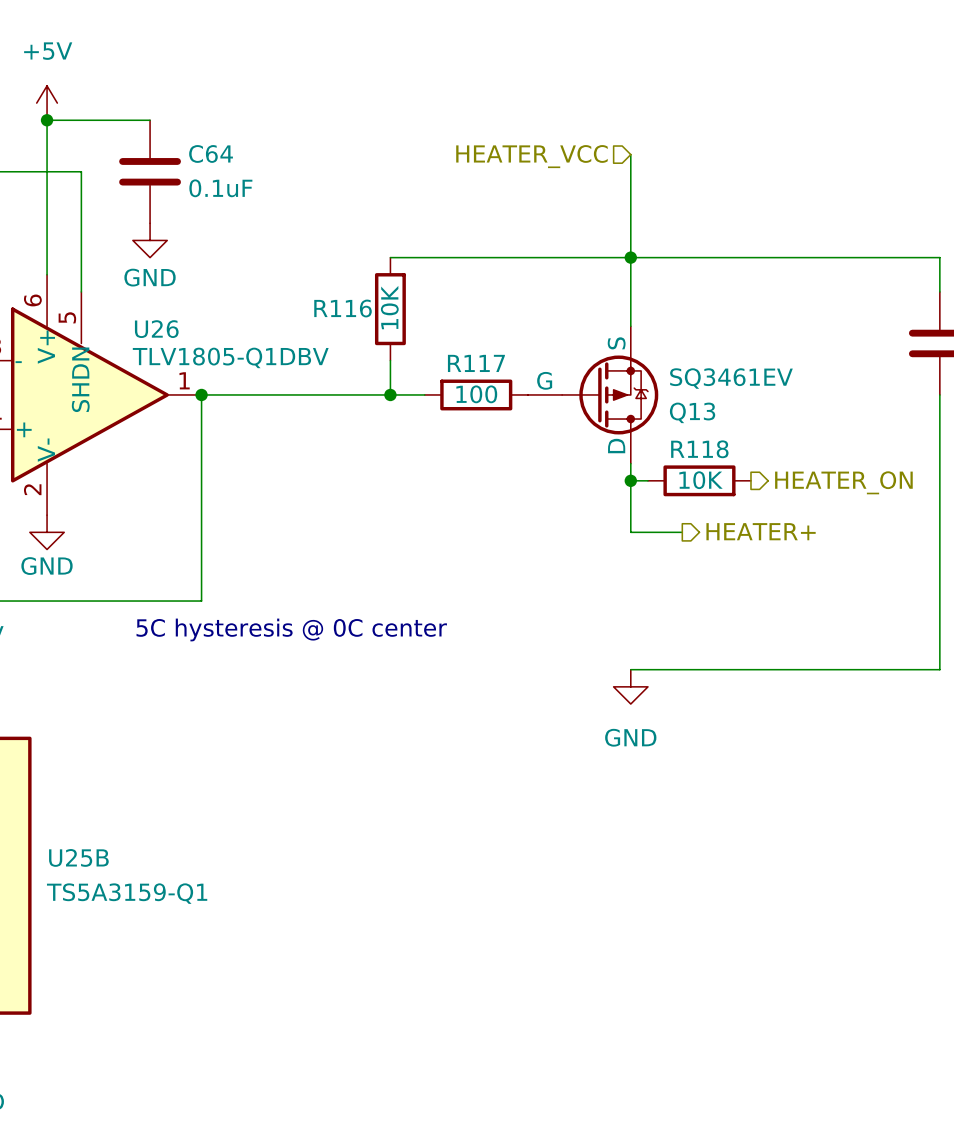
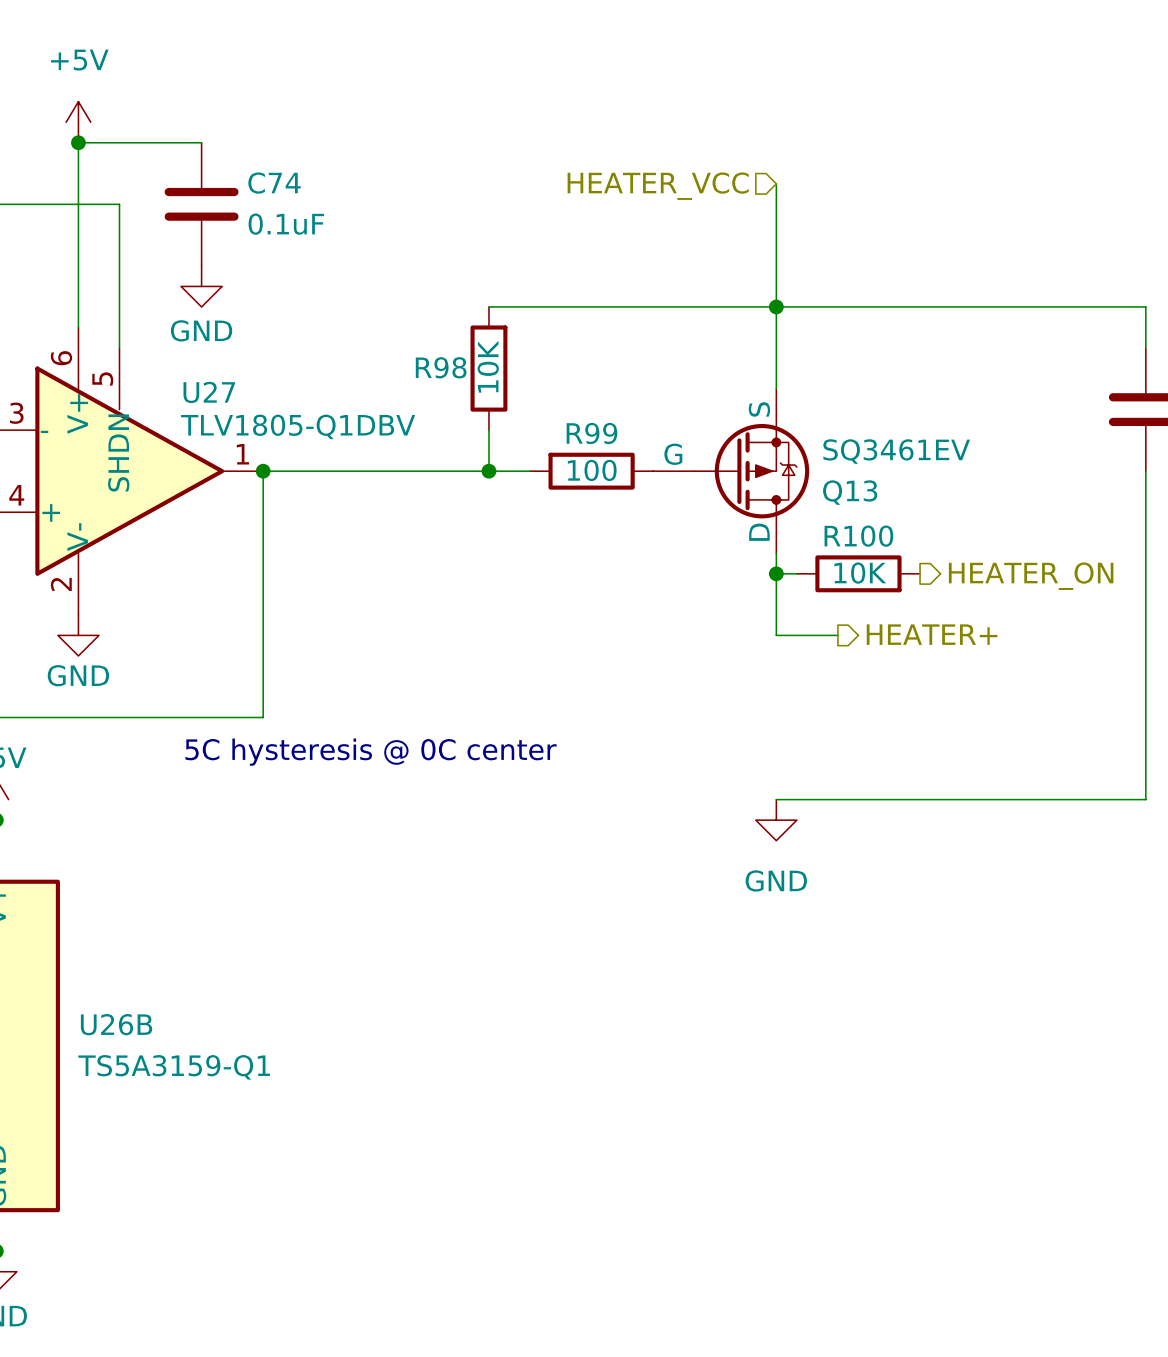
C64 name: C64 (211, 153) -> C74 (274, 183)
R116 name: R116 (343, 308) -> R98 (441, 367)
U26 name: U26 (156, 329) -> U27 (209, 392)
R117 name: R117 (476, 363) -> R99 (591, 433)
R118 name: R118 (699, 449) -> R100 (858, 536)
U25B name: U25B (78, 857) -> U26B (116, 1024)

